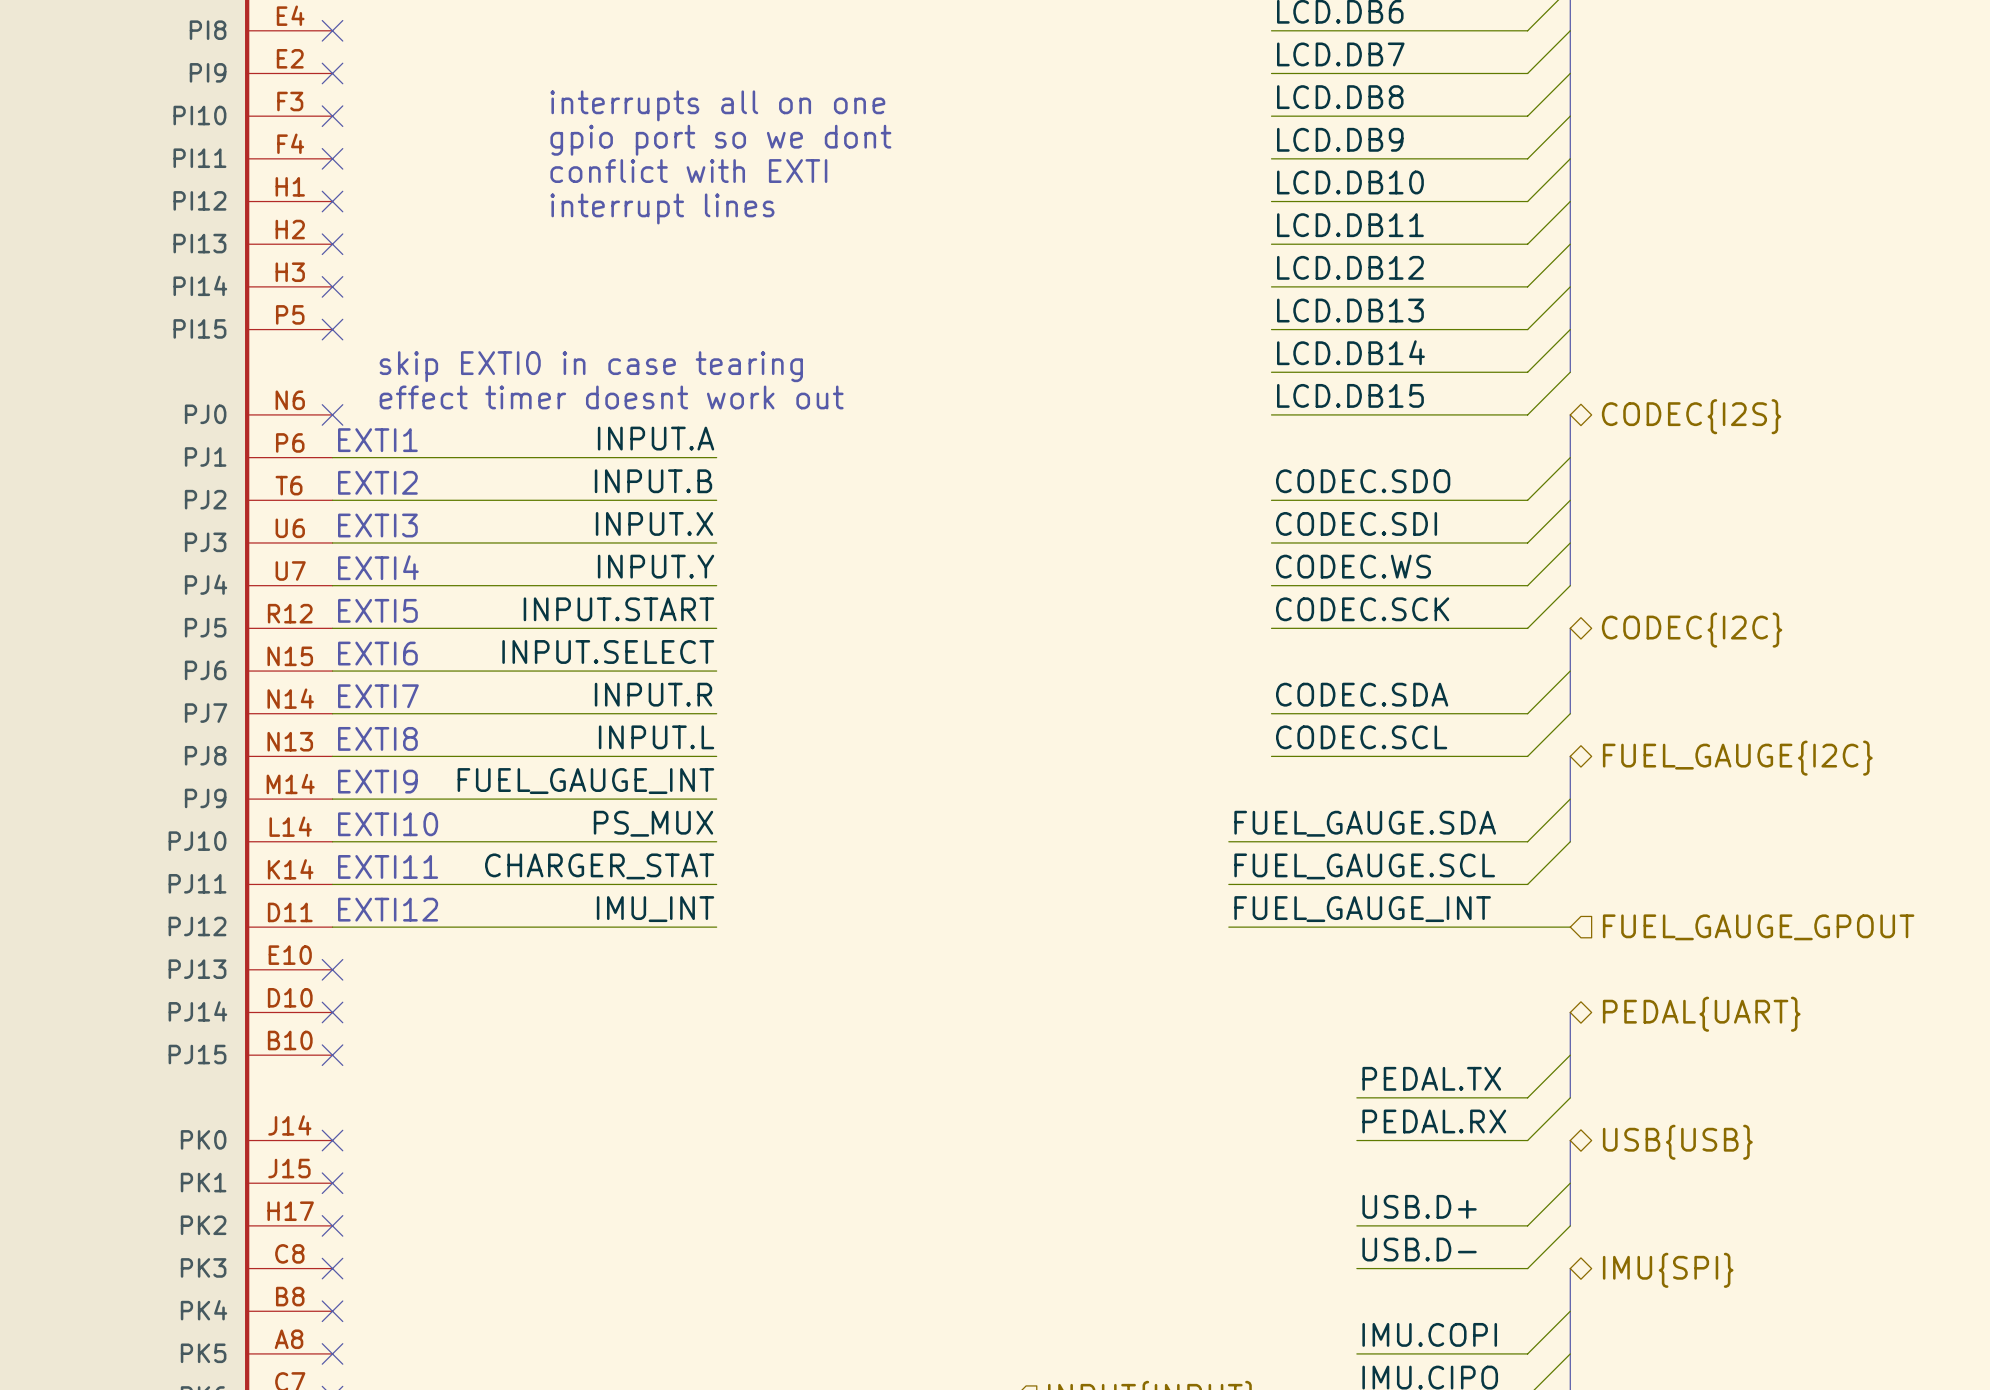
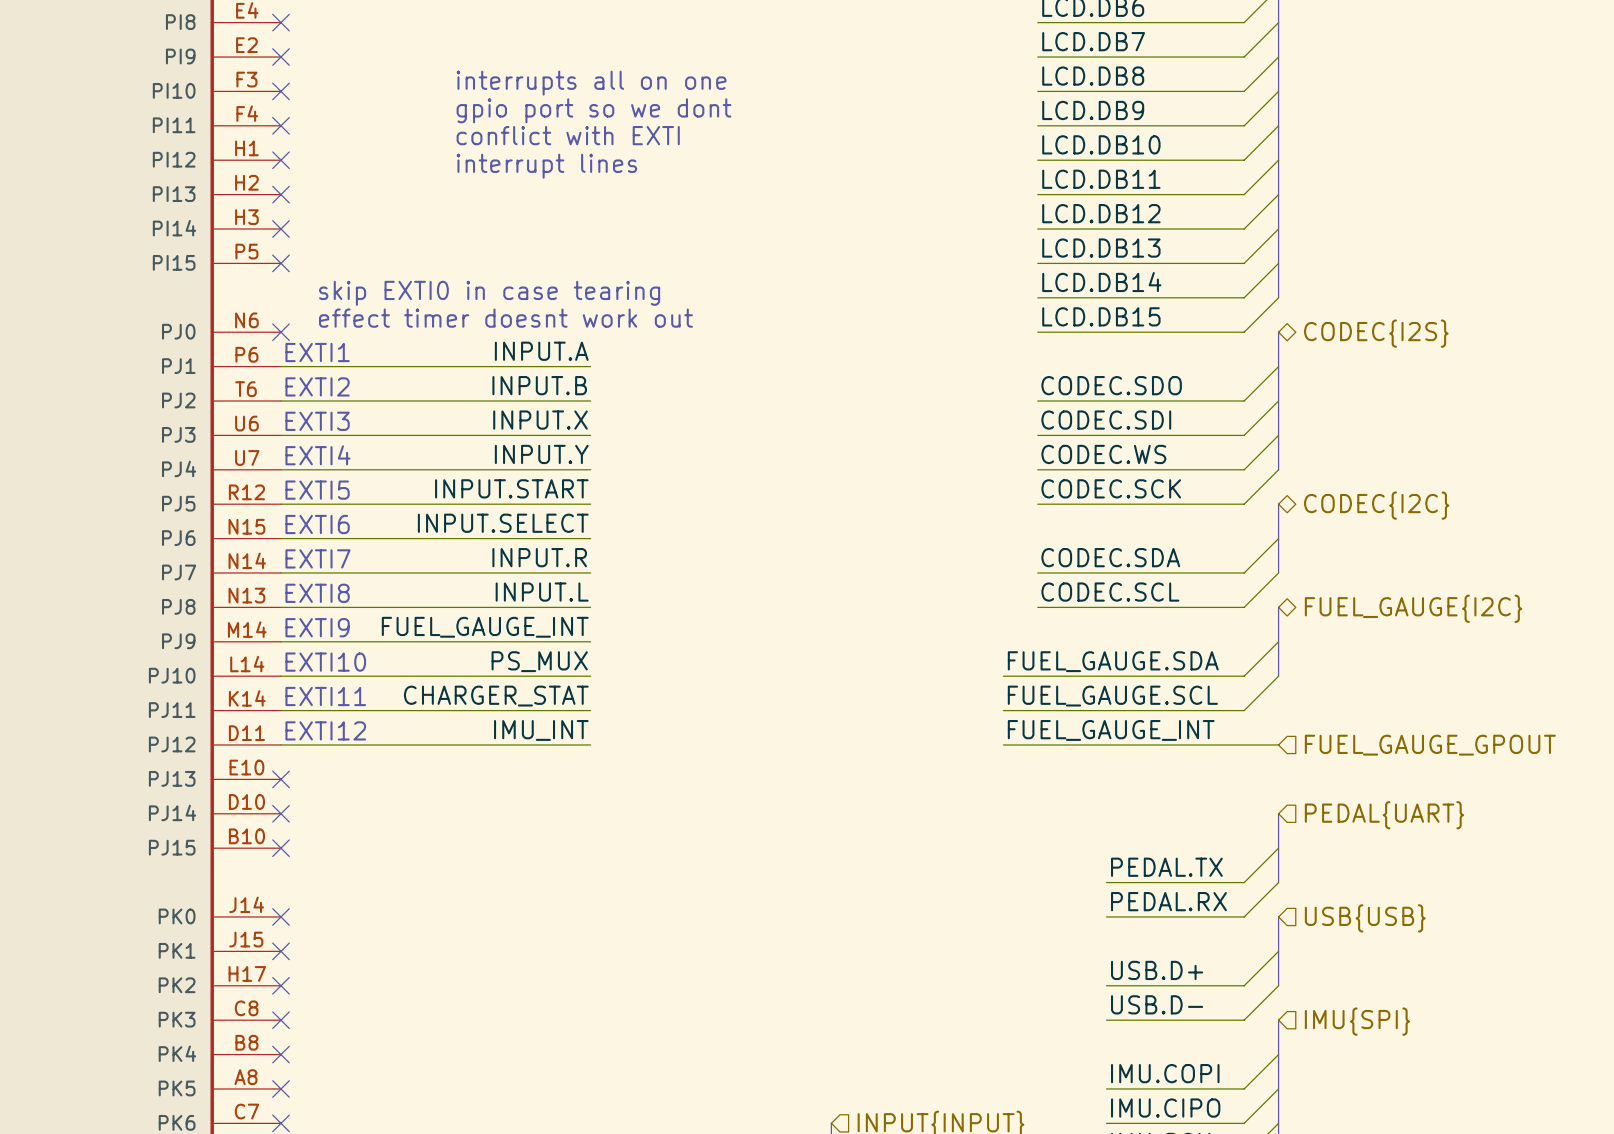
hierarchical label shape: bidirectional (1701, 1014) -> input (1384, 815)
hierarchical label shape: bidirectional (1677, 1142) -> input (1365, 918)
hierarchical label shape: bidirectional (1668, 1270) -> input (1357, 1021)

